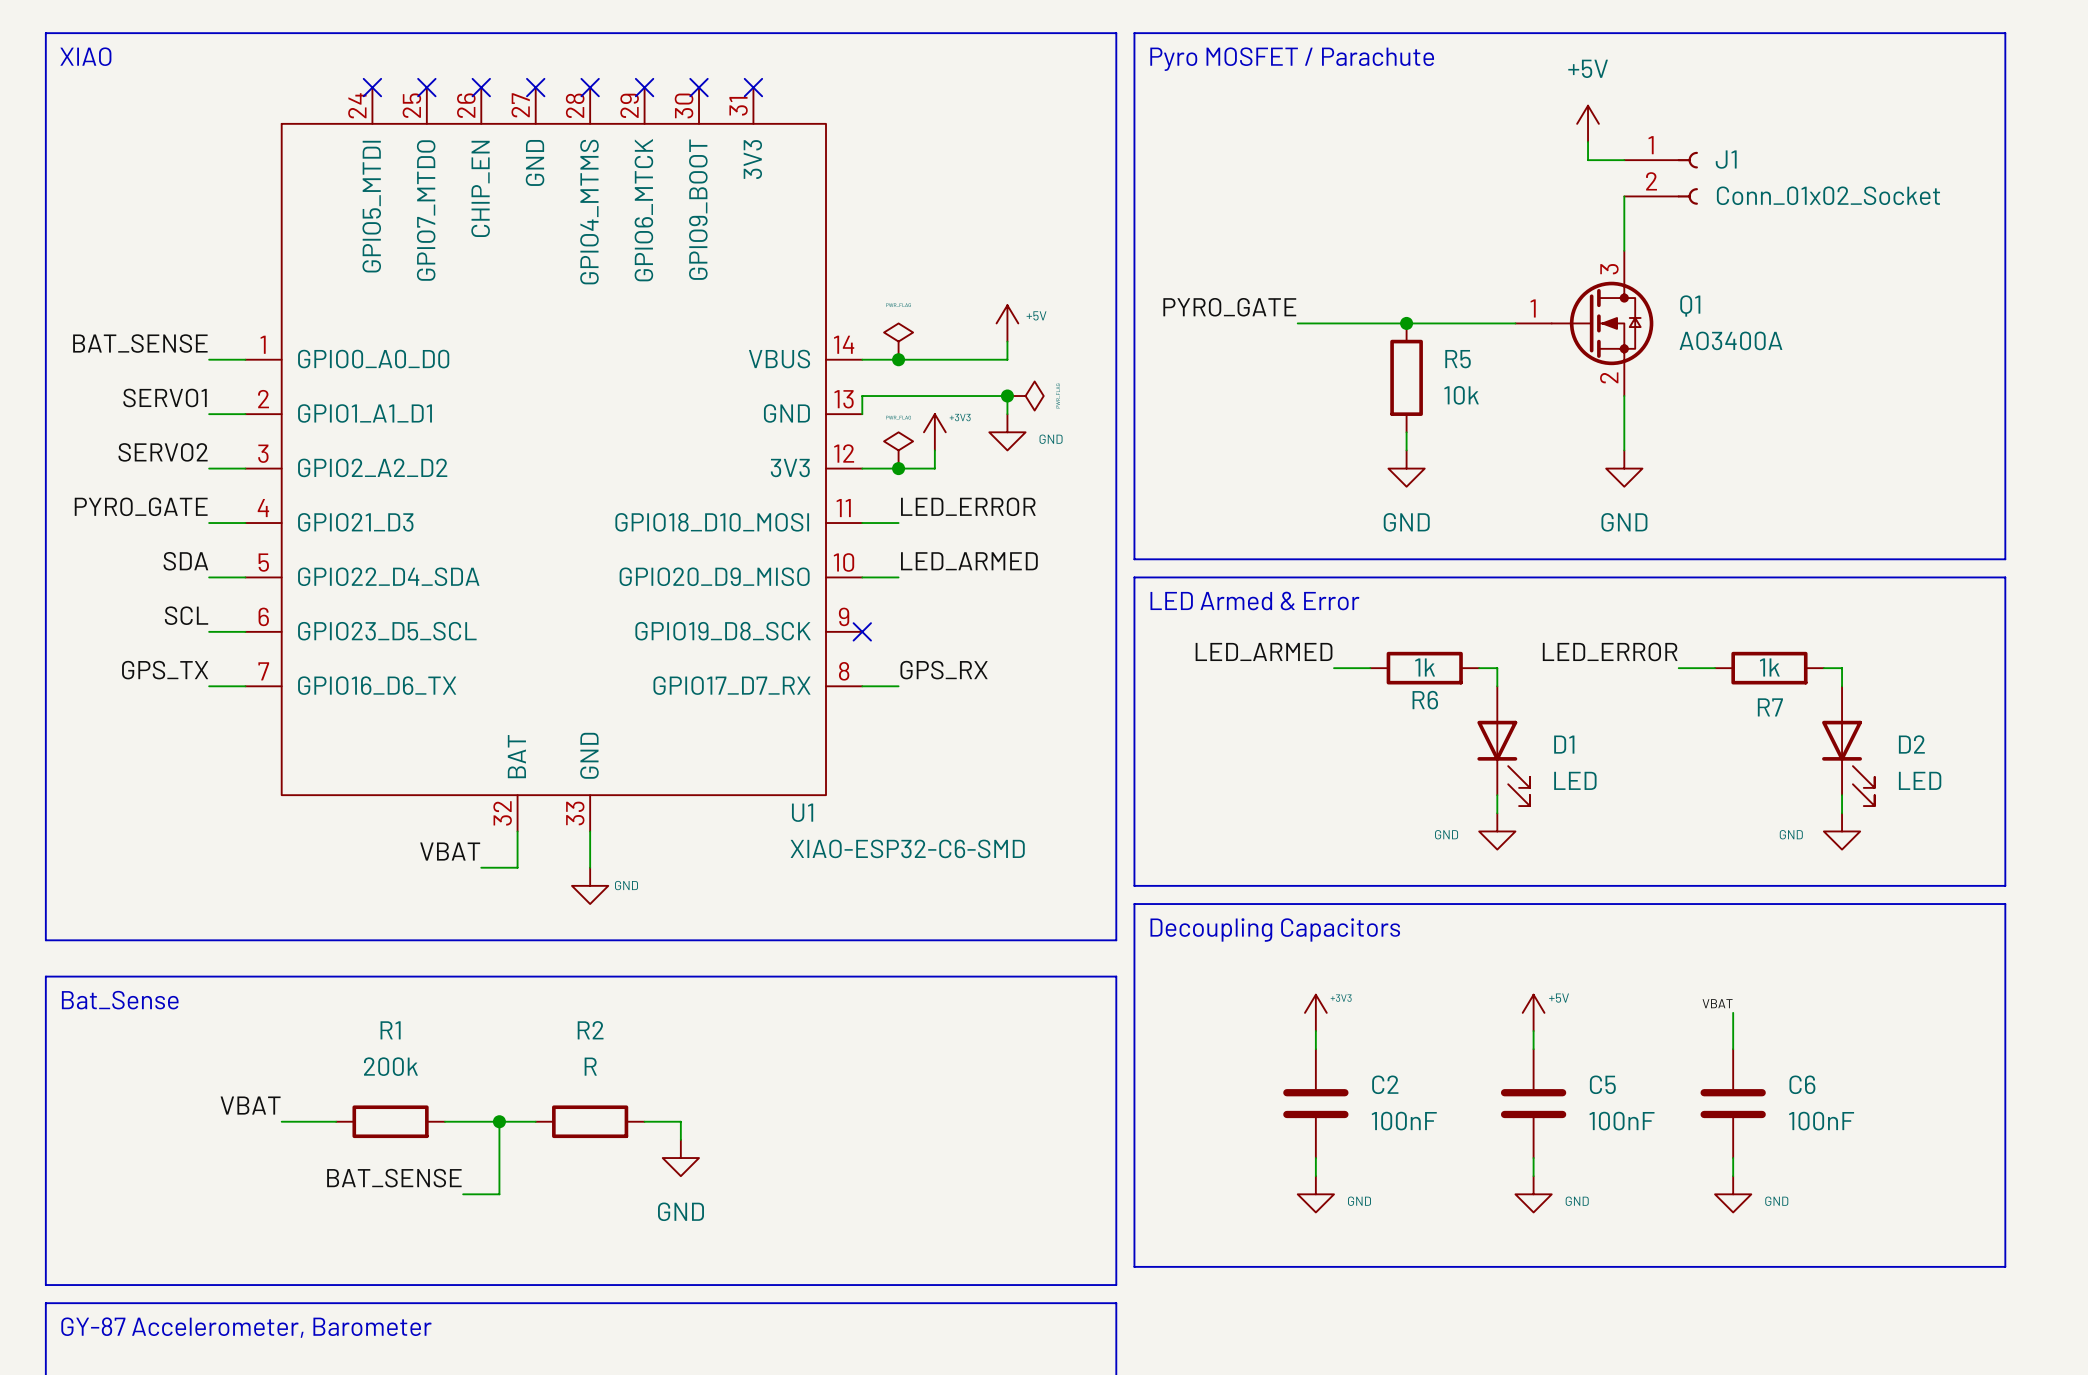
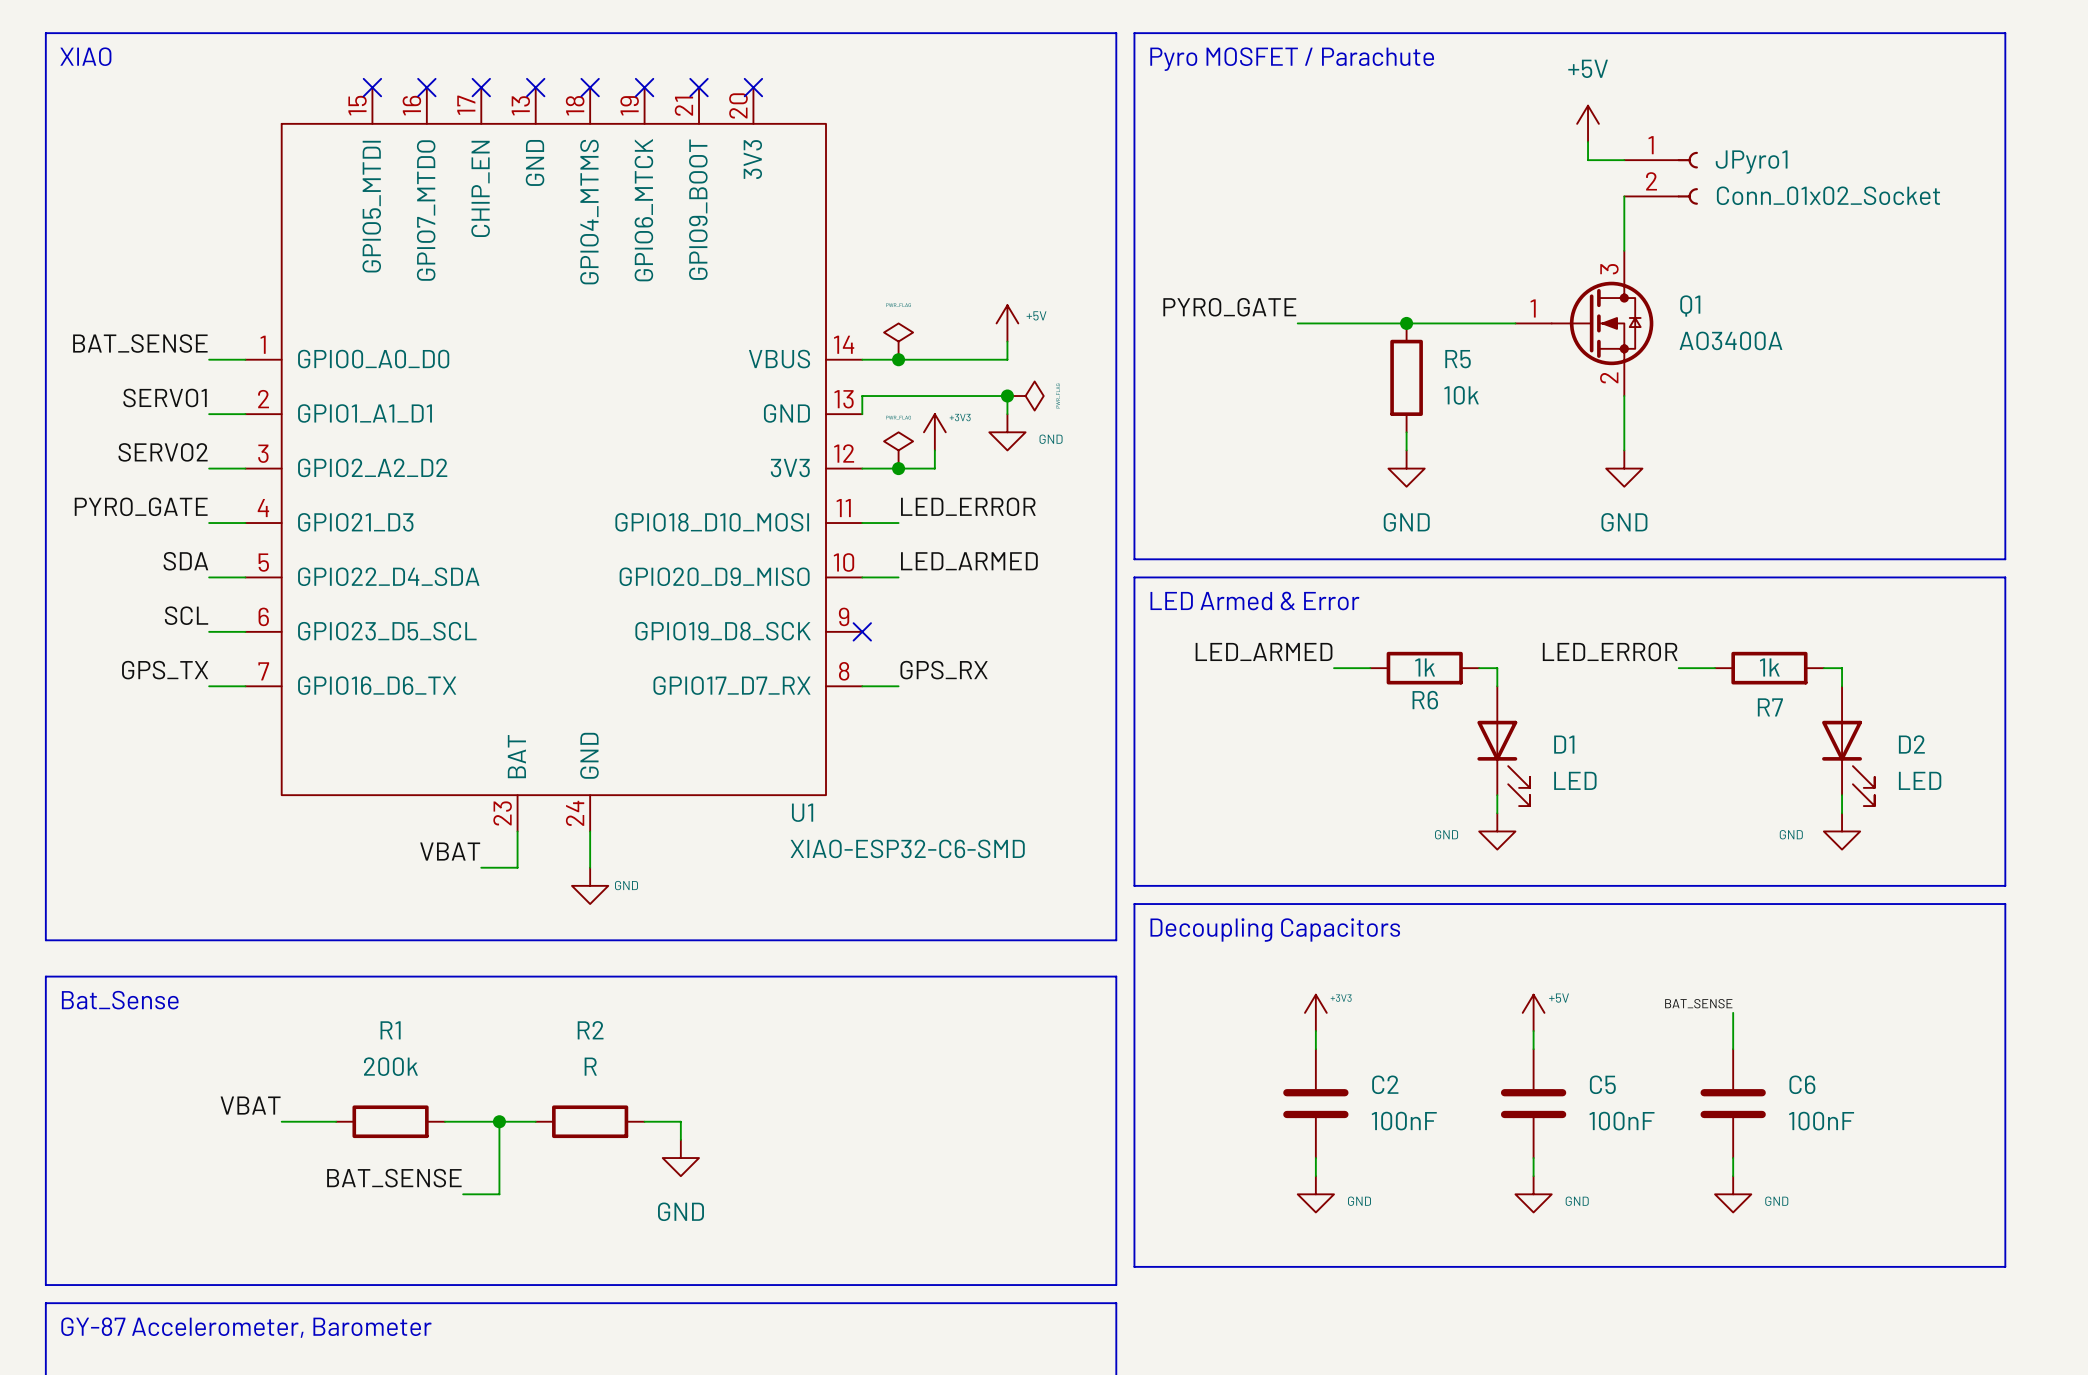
U1 symbol: [245, 87, 863, 832] -> [245, 87, 863, 832]
J1 name: J1 (1726, 159) -> JPyro1 (1751, 162)
label: VBAT (1717, 1003) -> BAT_SENSE (1698, 1003)

